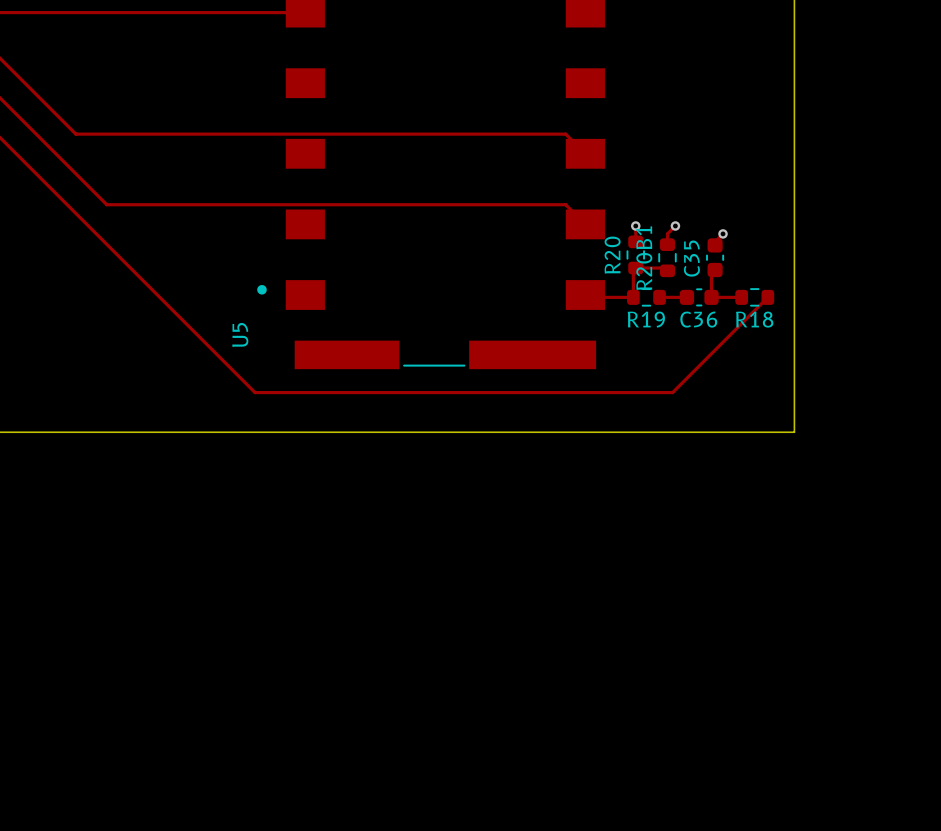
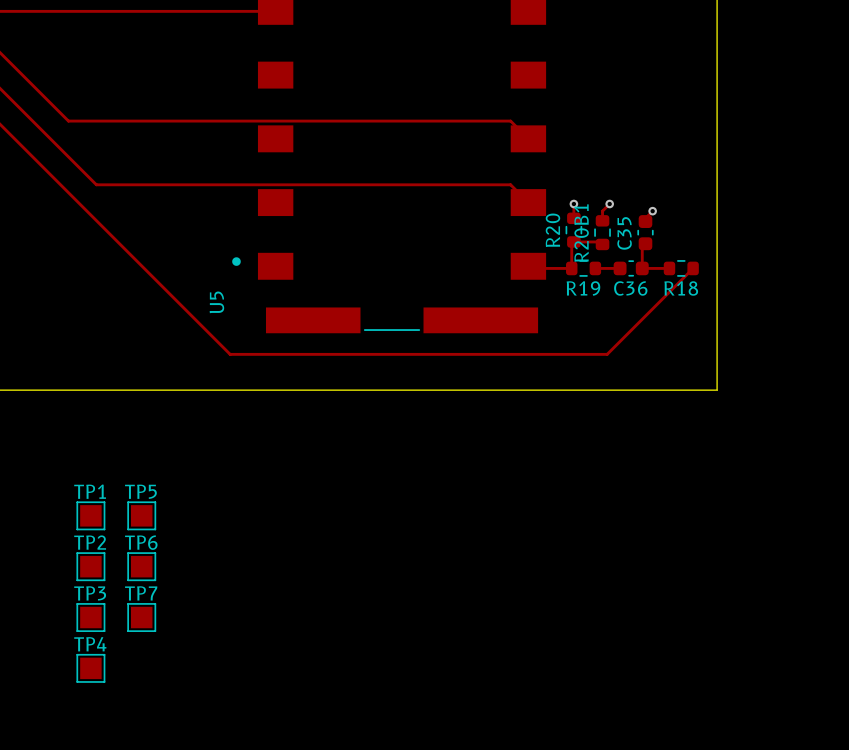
TP1: none -> (90, 515)
TP5: none -> (141, 515)
TP2: none -> (90, 566)
TP6: none -> (141, 566)
TP3: none -> (90, 617)
TP7: none -> (141, 617)
TP4: none -> (90, 668)

